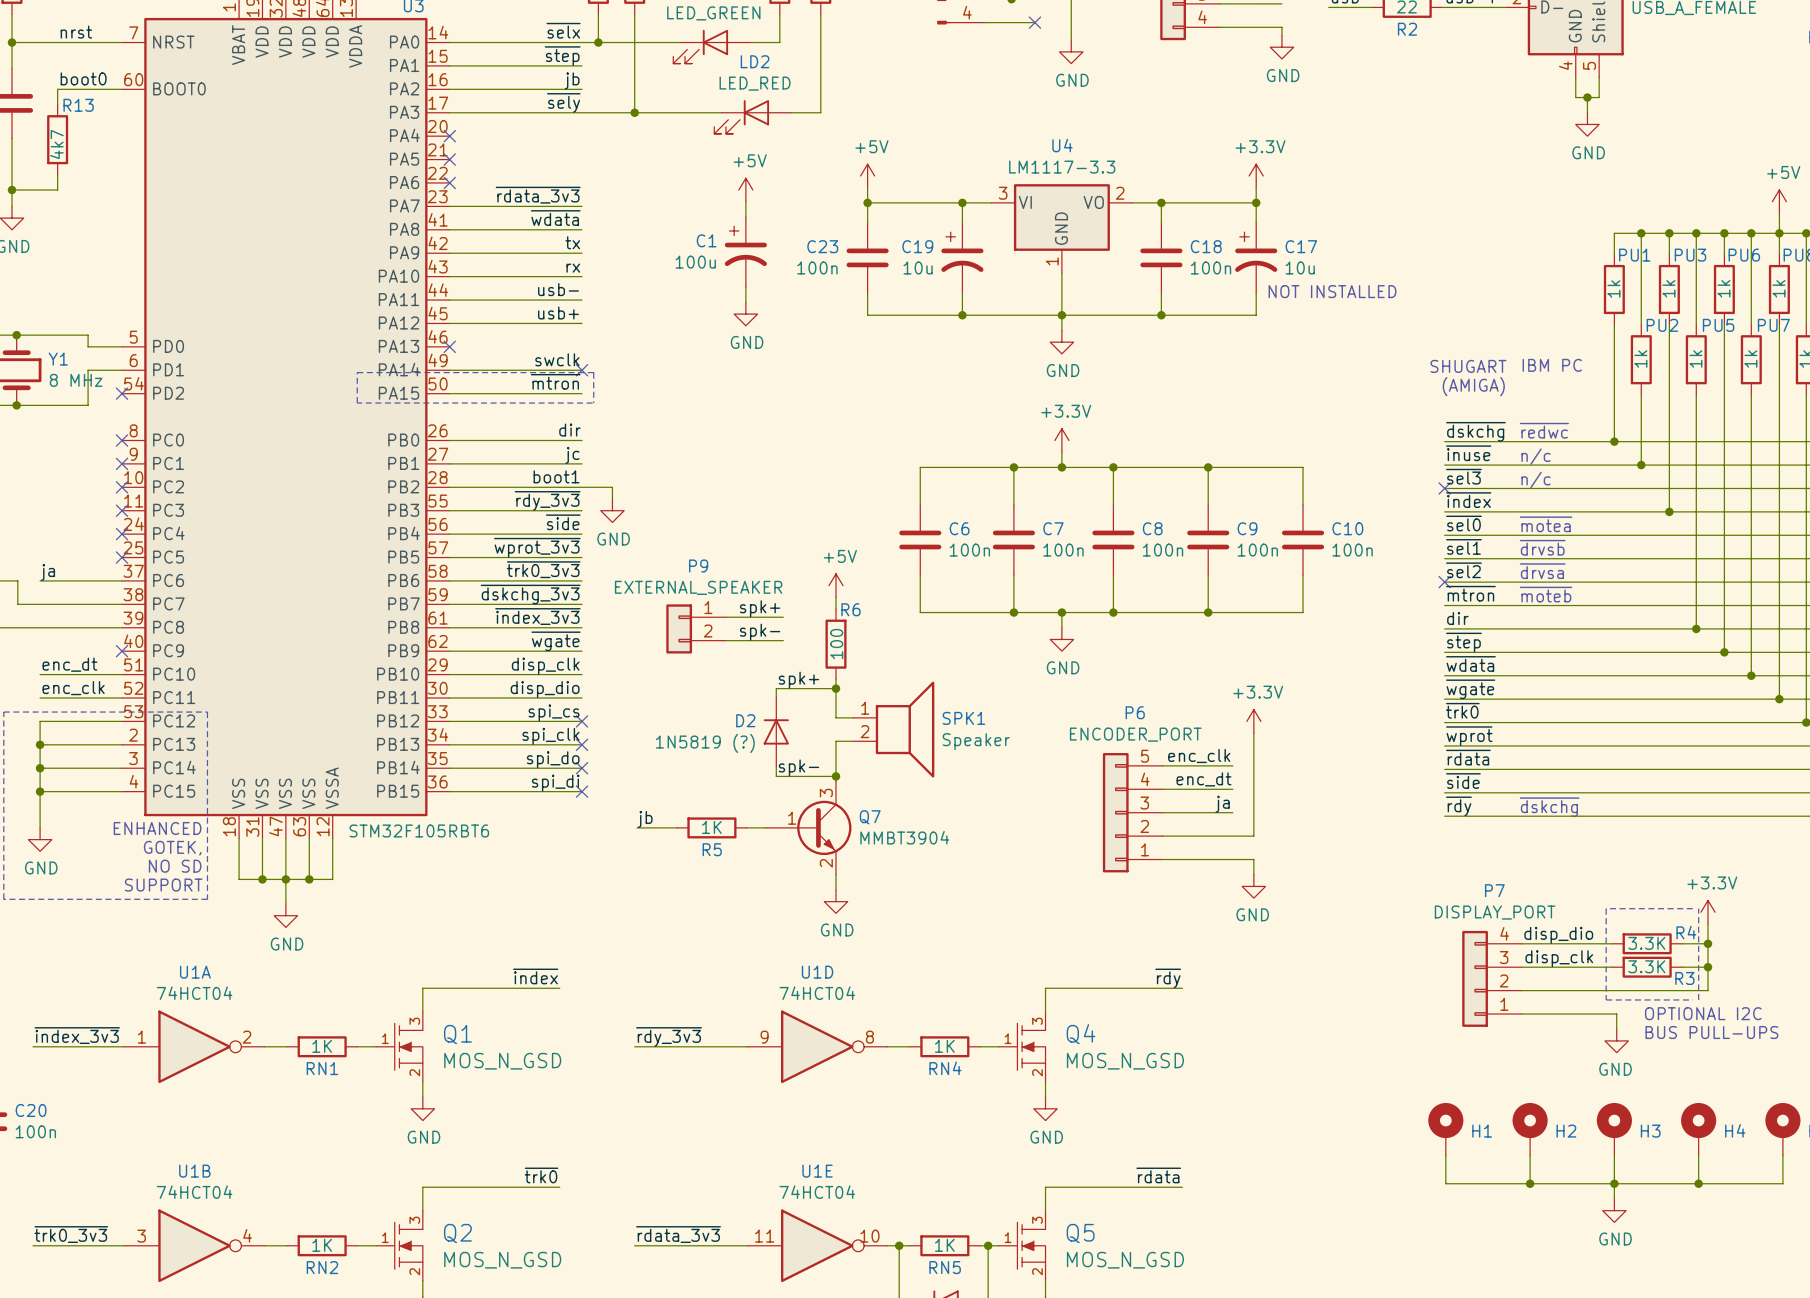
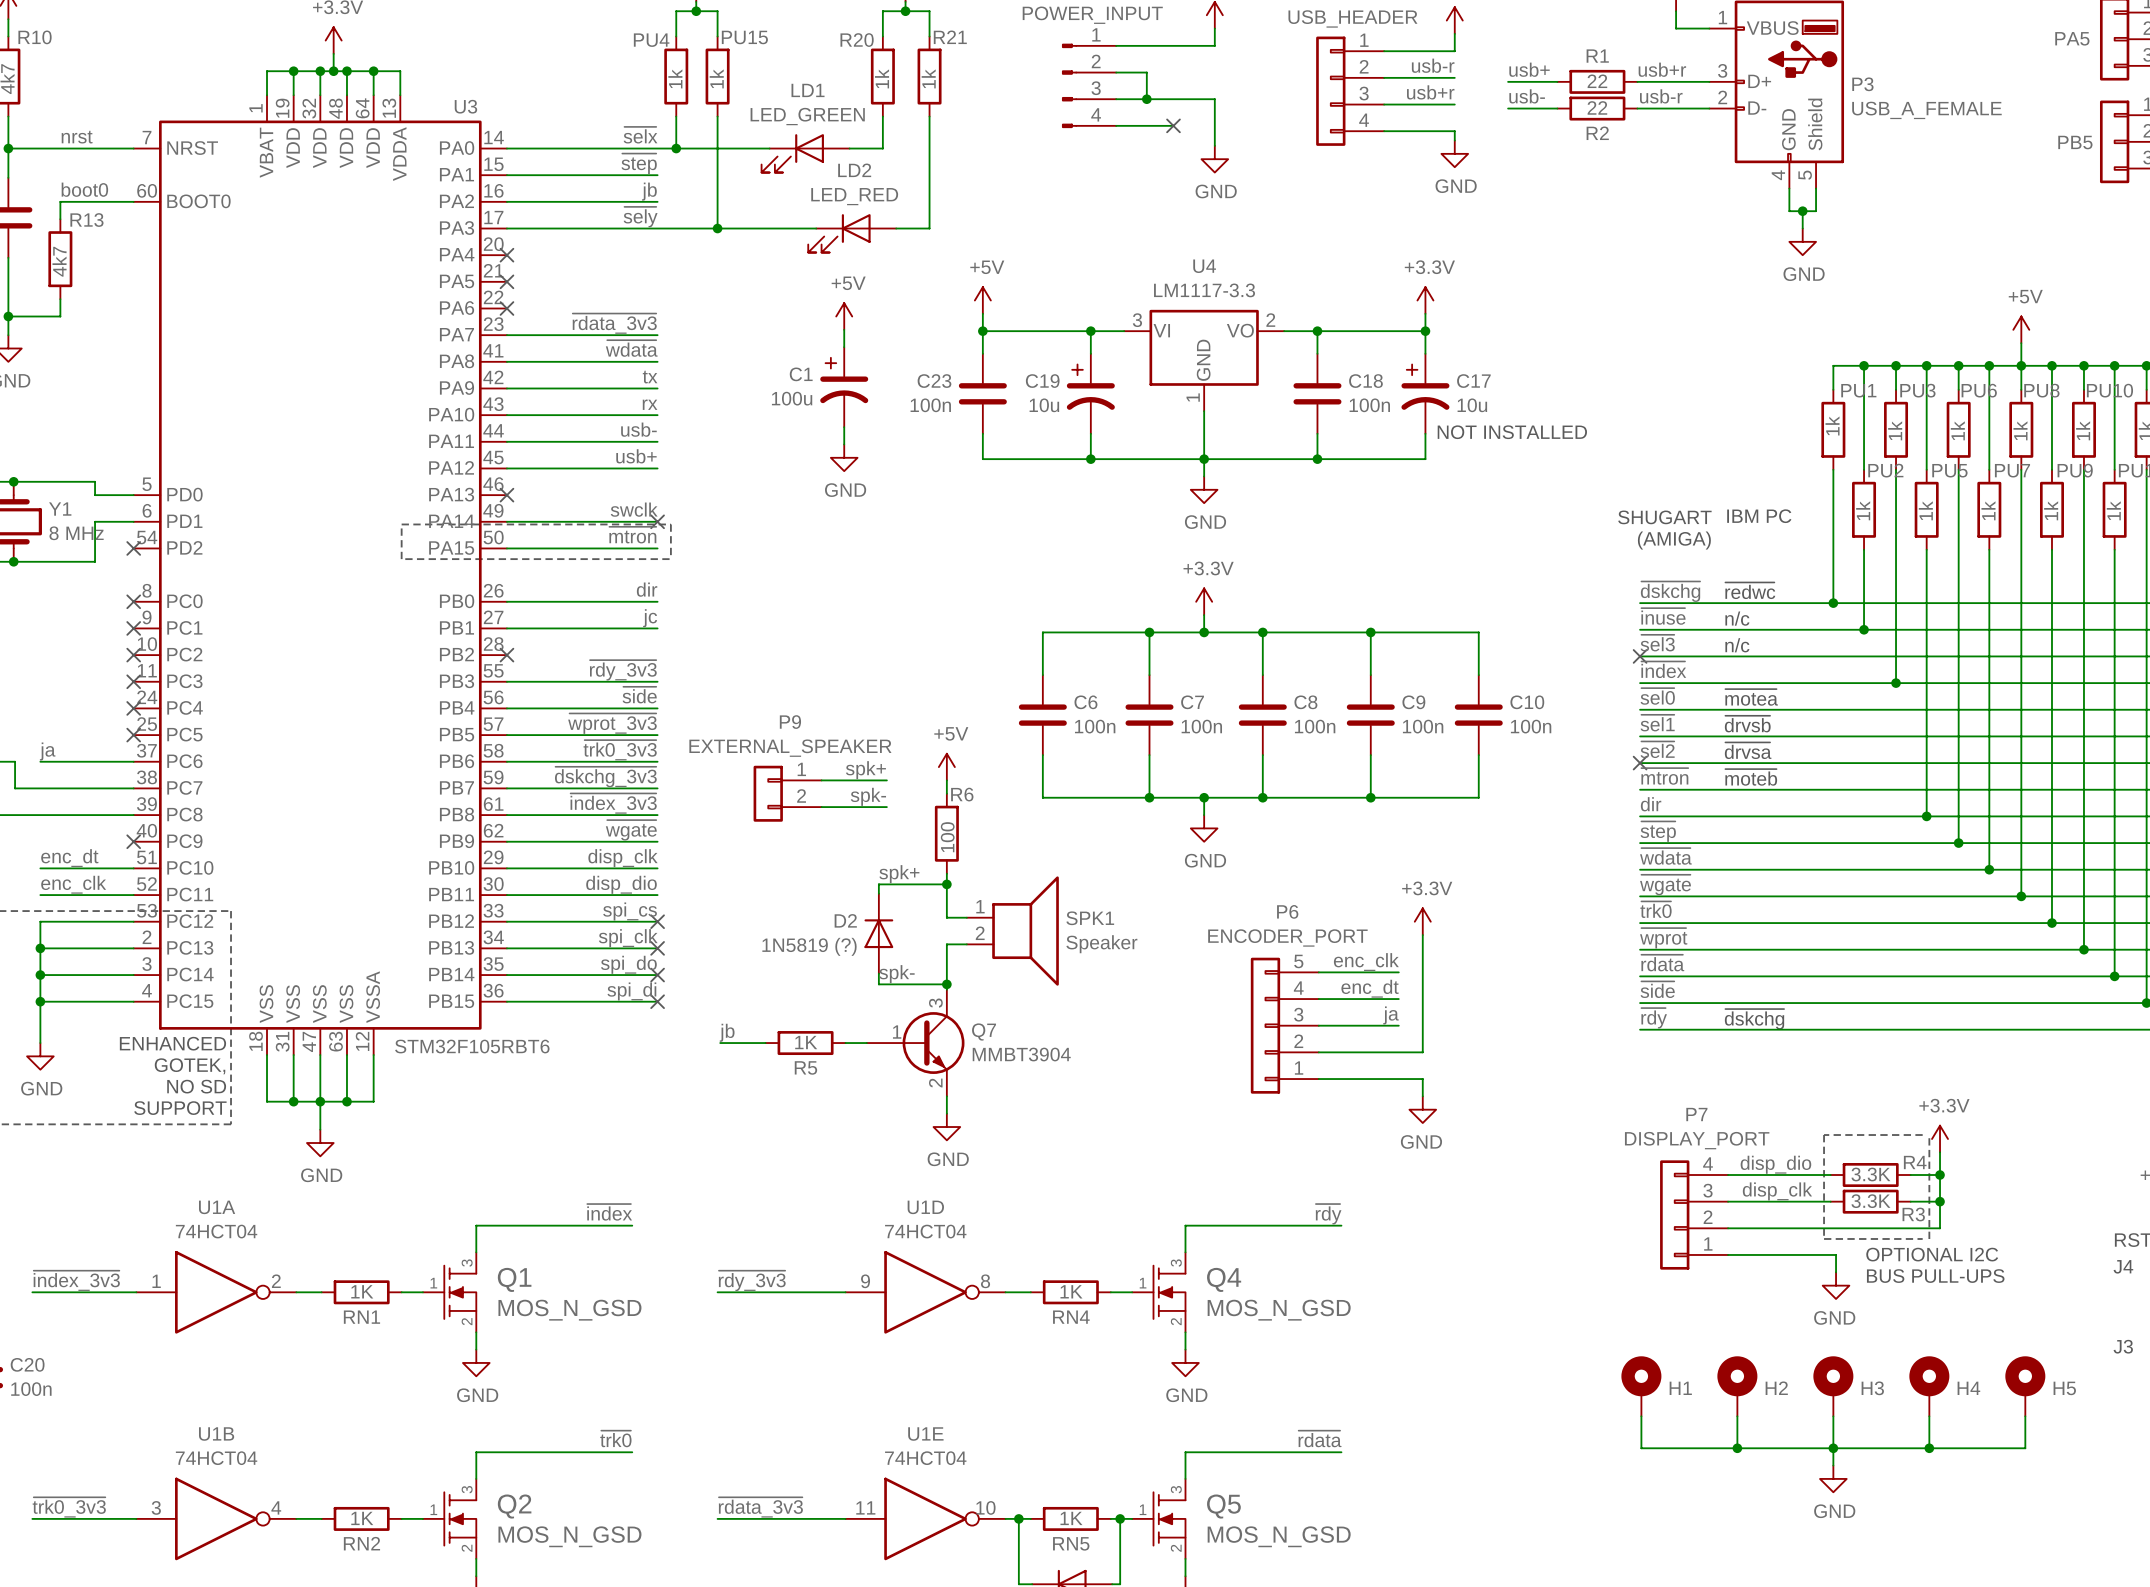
label: boot1 (556, 476) -> none
wire: (449, 487) (612, 487) (612, 499) -> none
no-connect mark: none -> (506, 655)
power symbol: GND (612, 510) -> none
label position: spk+ (760, 608) -> spk+ (865, 770)
wire: (725, 617) (783, 617) -> (821, 780) (886, 780)
P9 position: (696, 628) -> (787, 793)
label position: spk- (760, 632) -> spk- (868, 796)
wire: (725, 640) (783, 640) -> (821, 807) (886, 807)

